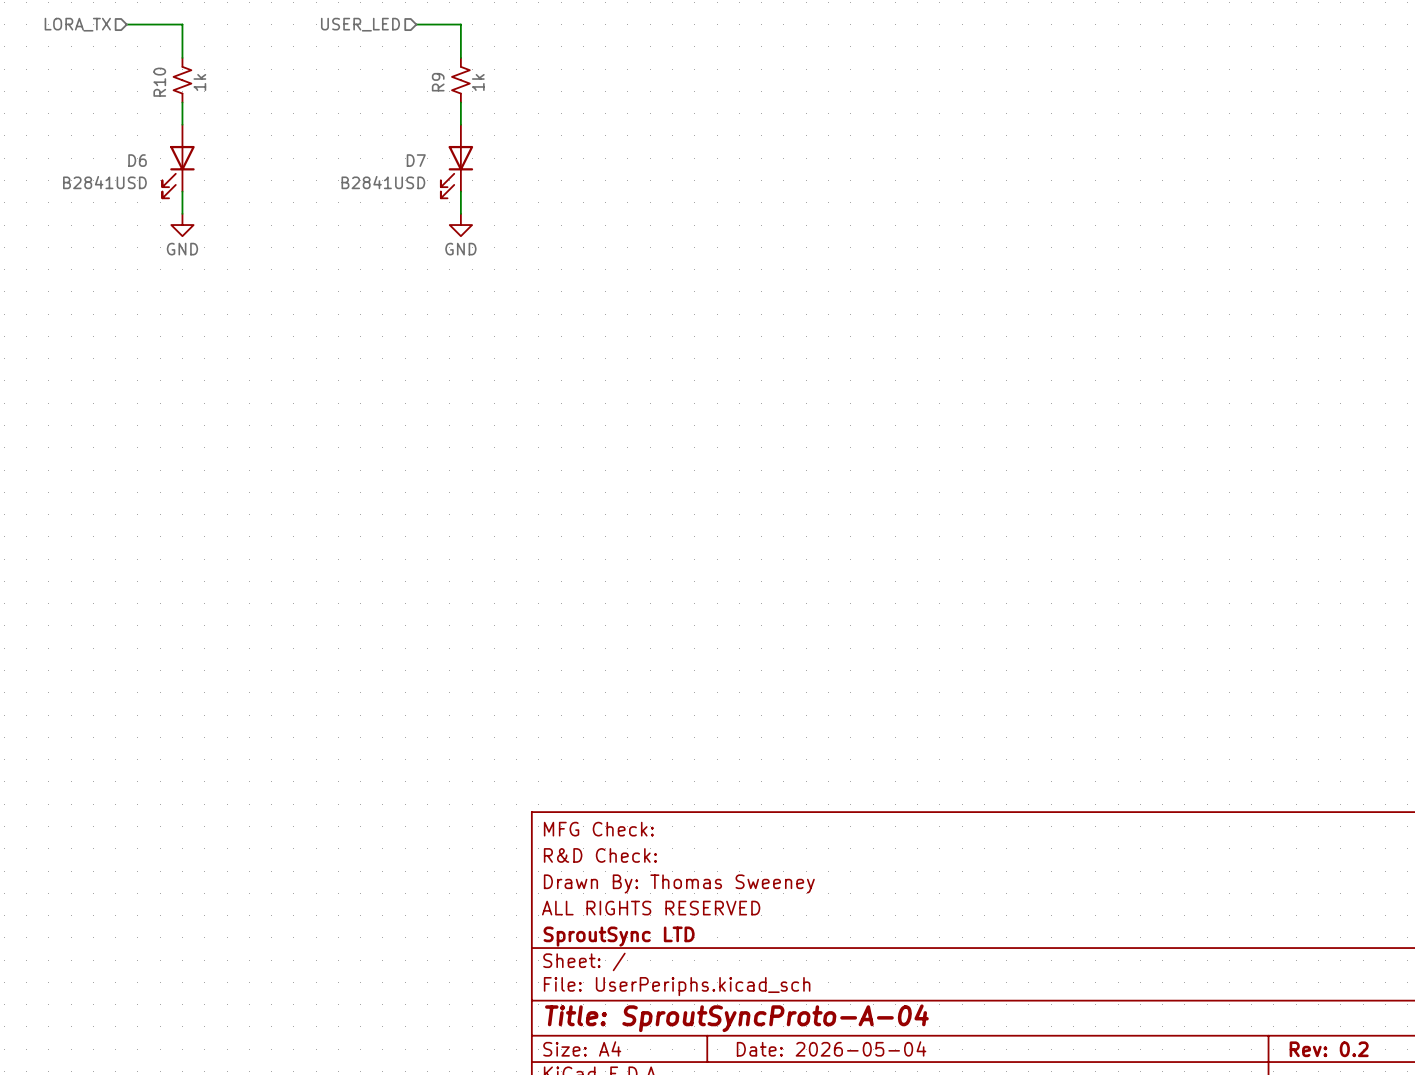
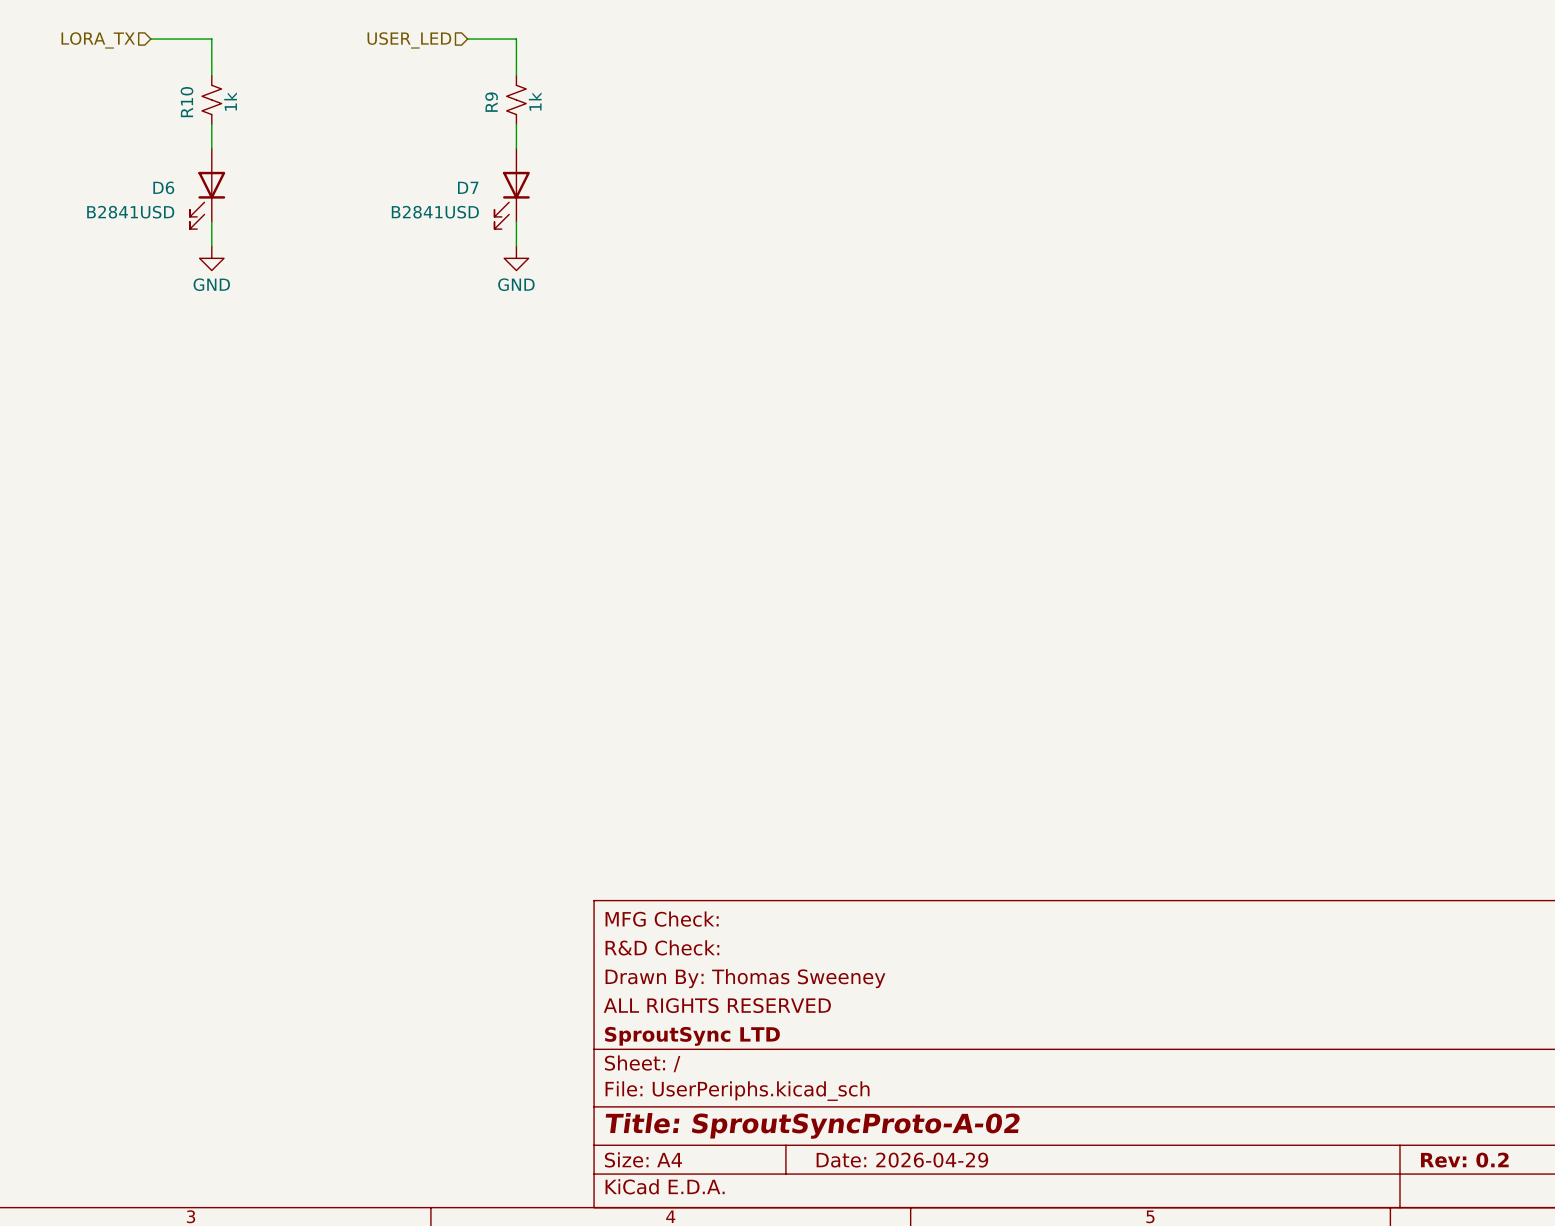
title block: Title: SproutSyncProto-A-04 (736, 1018) -> Title: SproutSyncProto-A-02 (812, 1125)
title block: Date: 2026-05-04 (831, 1048) -> Date: 2026-04-29 (902, 1160)

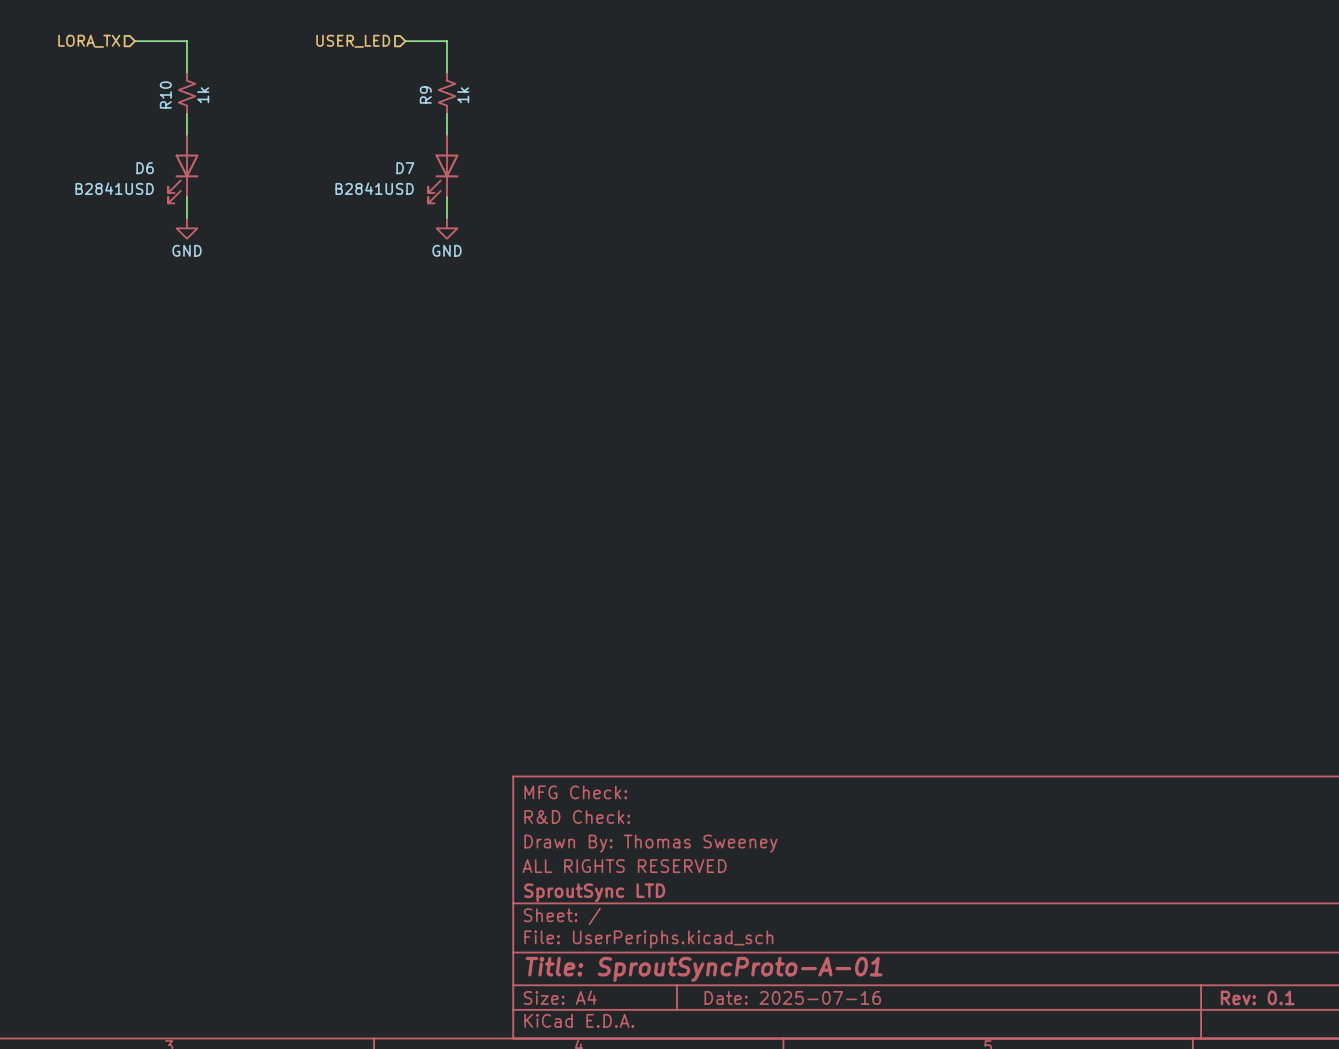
title block: Title: SproutSyncProto-A-02 (812, 1125) -> Title: SproutSyncProto-A-01 (703, 969)
title block: Date: 2026-04-29 (902, 1160) -> Date: 2025-07-16 (792, 997)
title block: Rev: 0.2 (1464, 1160) -> Rev: 0.1 (1257, 997)

